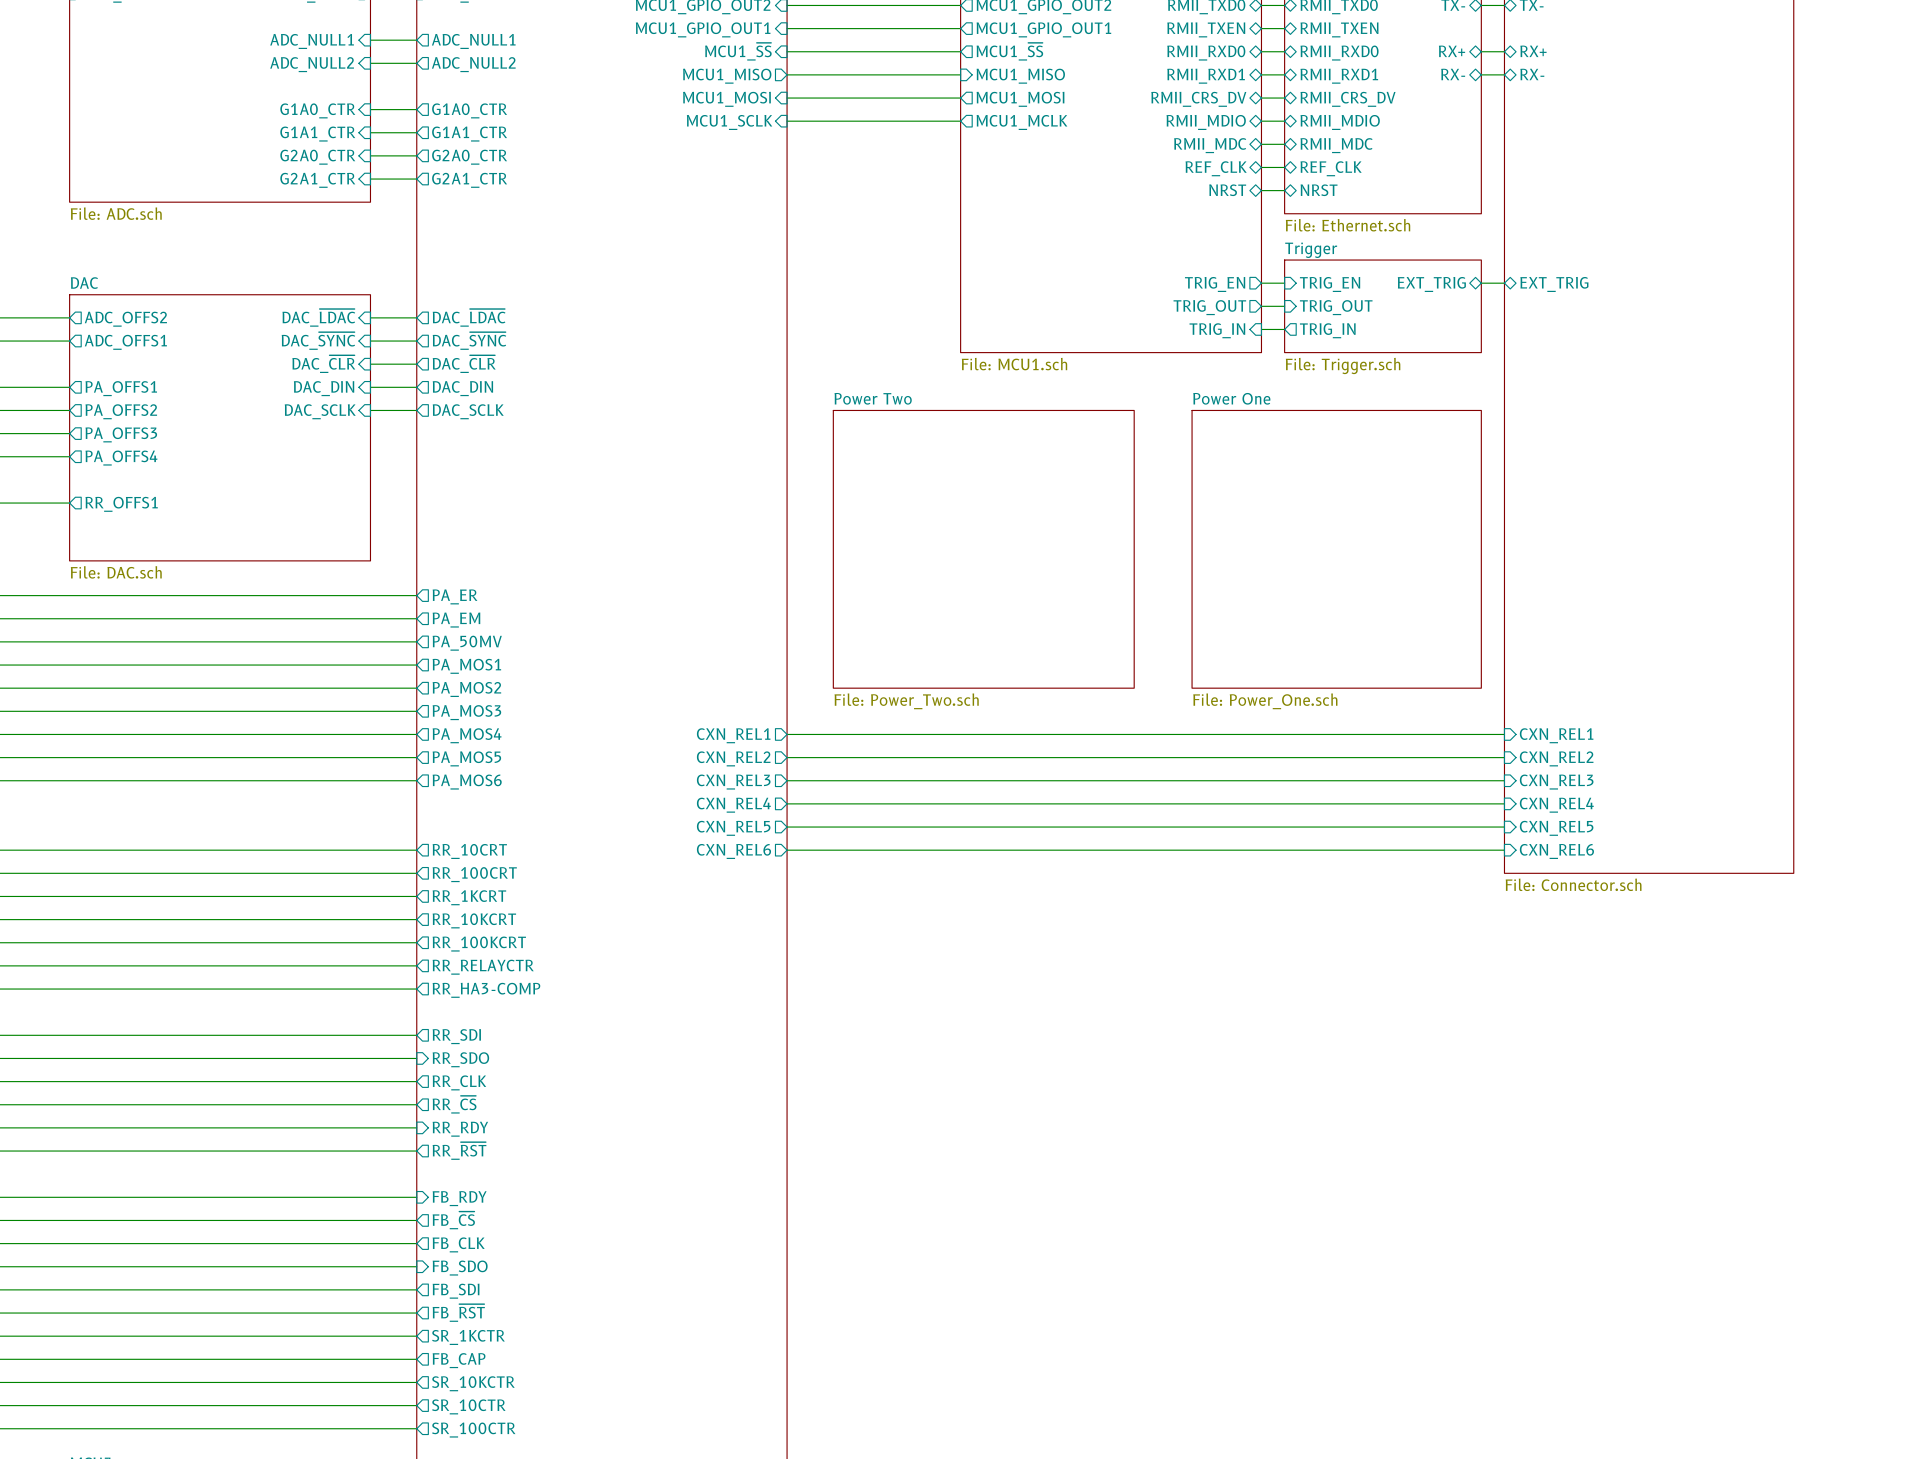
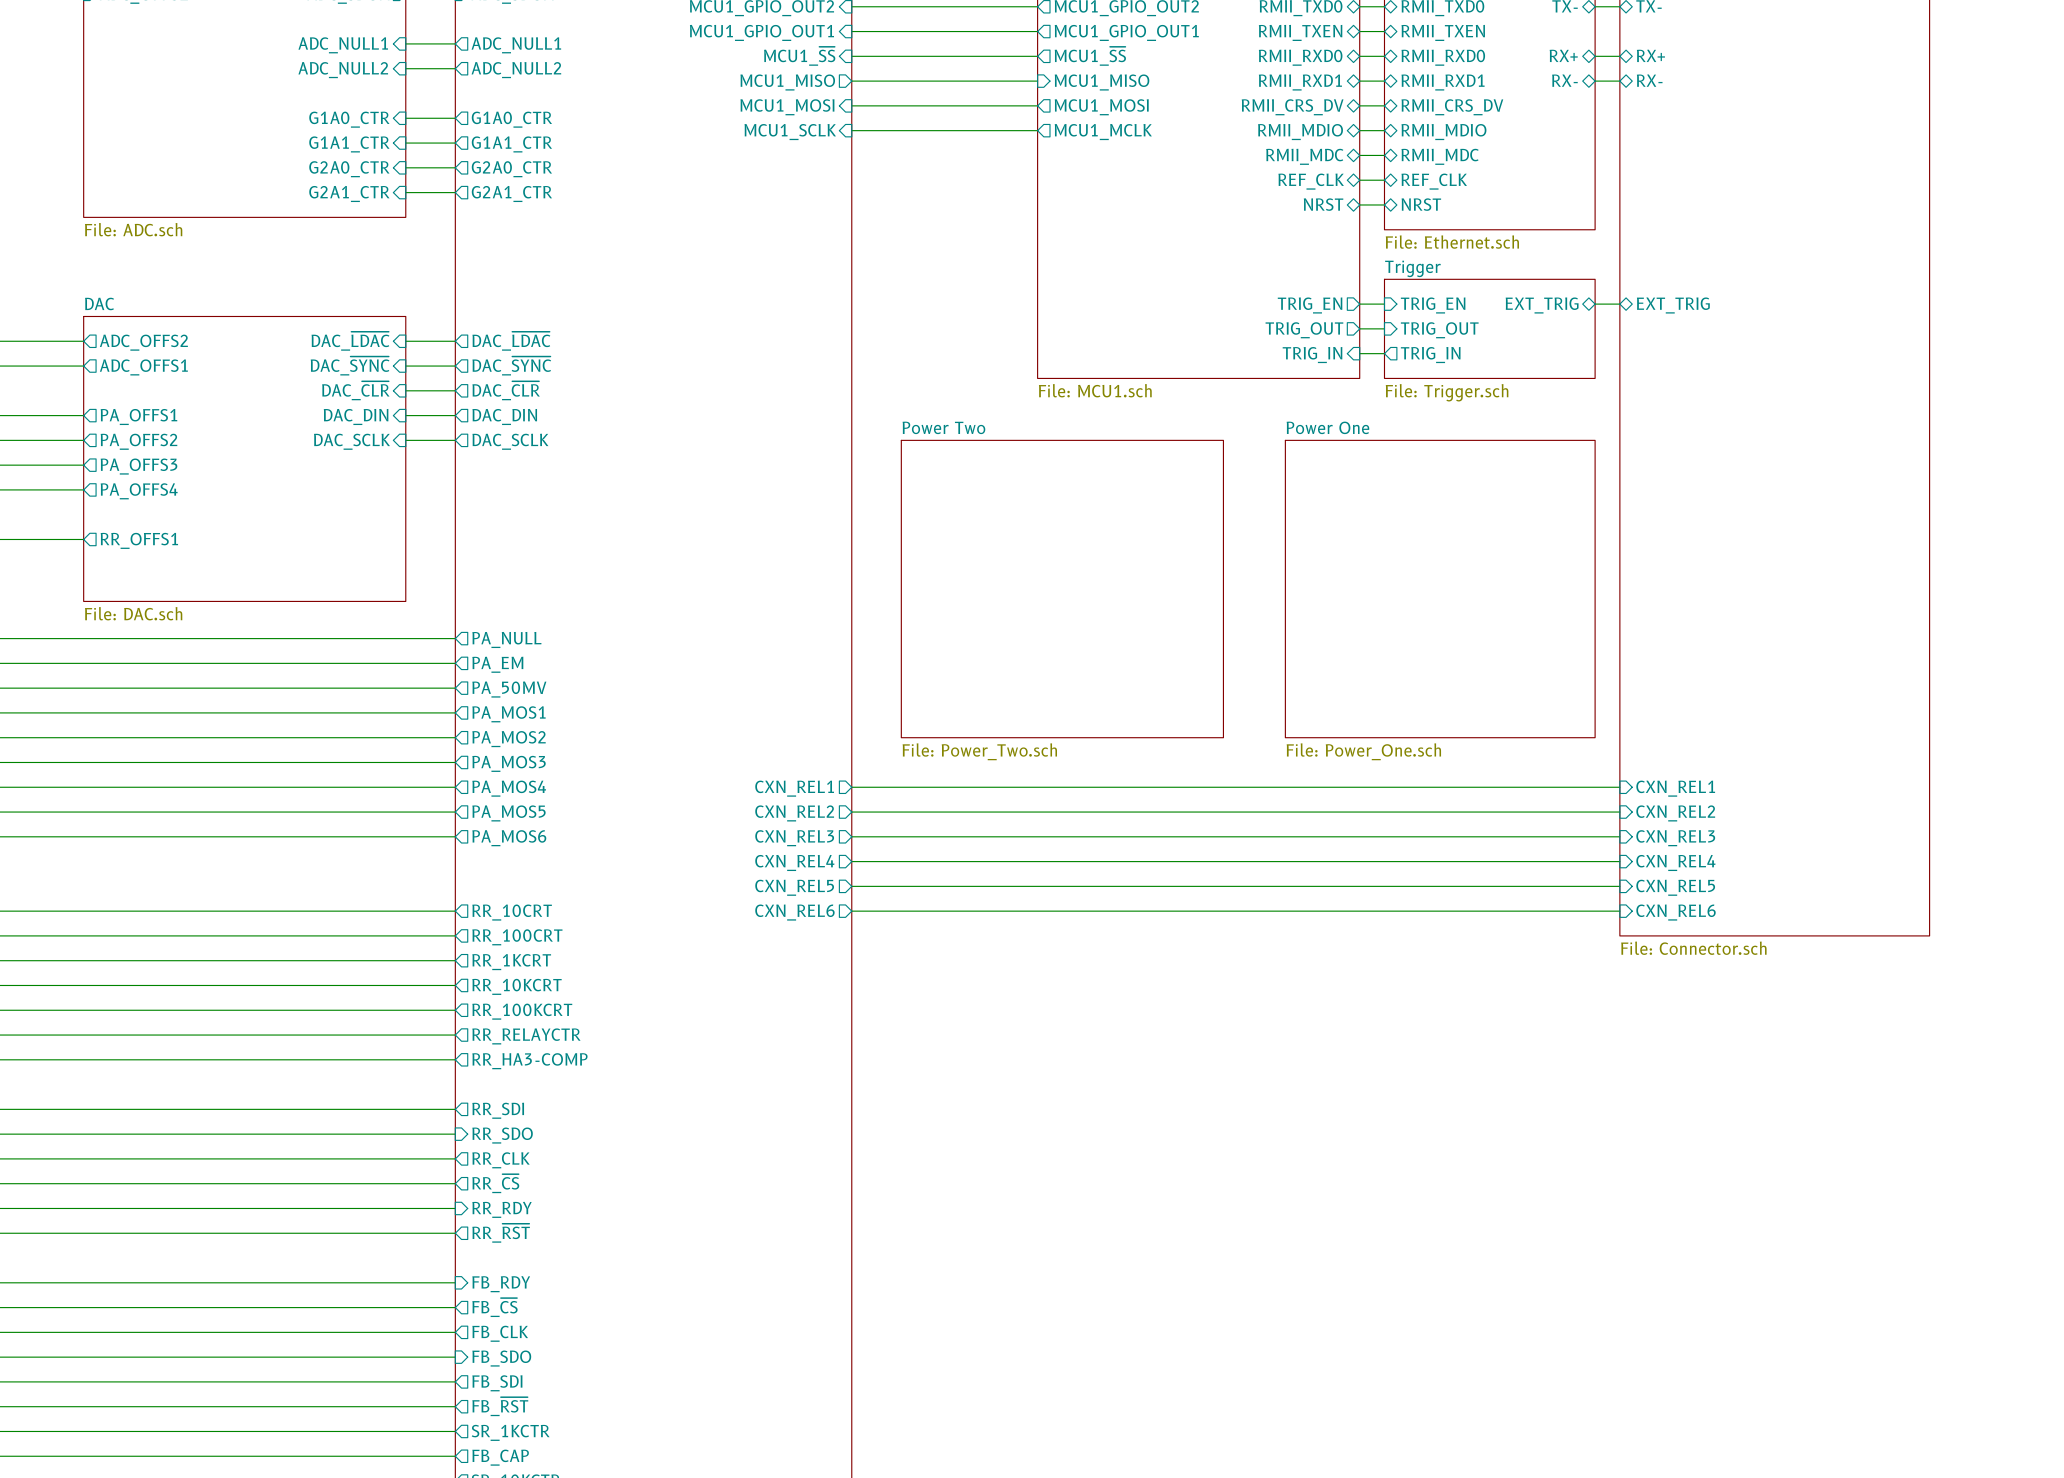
sheet pin: PA_ER (455, 596) -> PA_NULL (506, 639)

